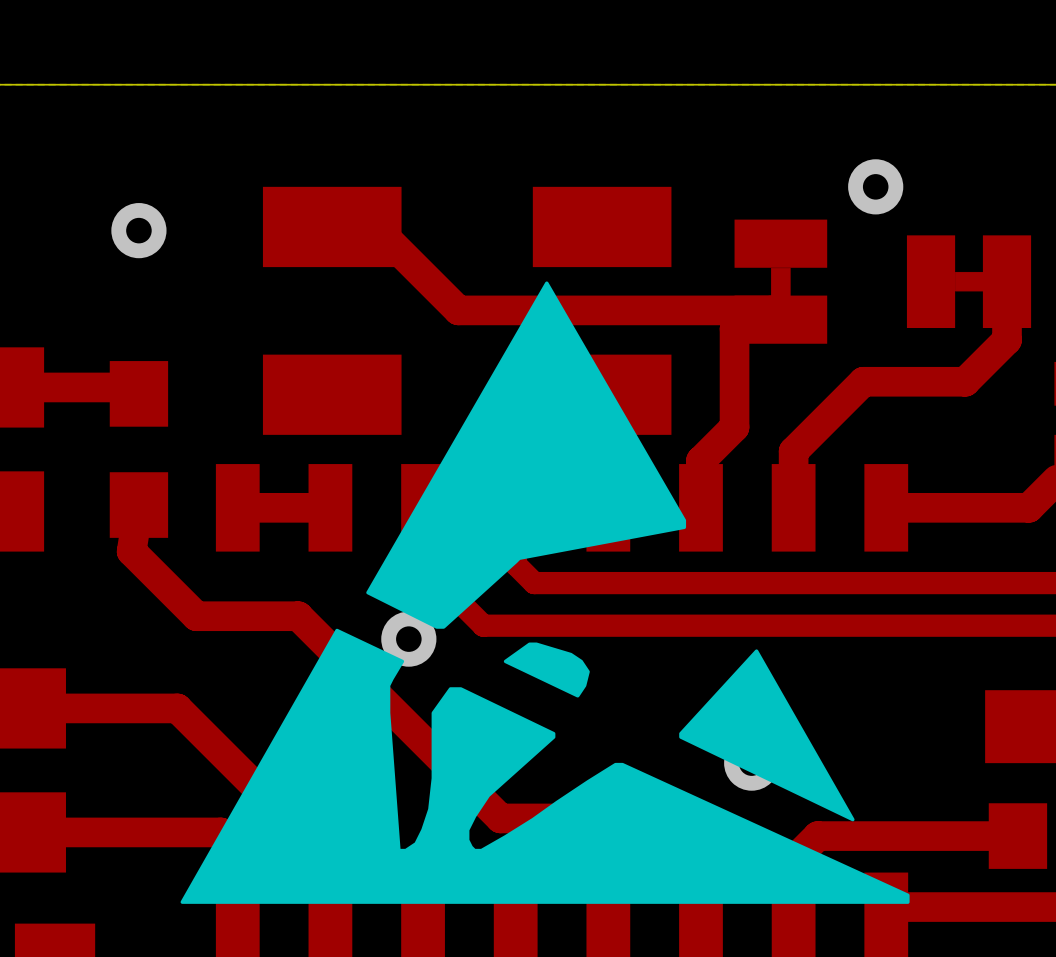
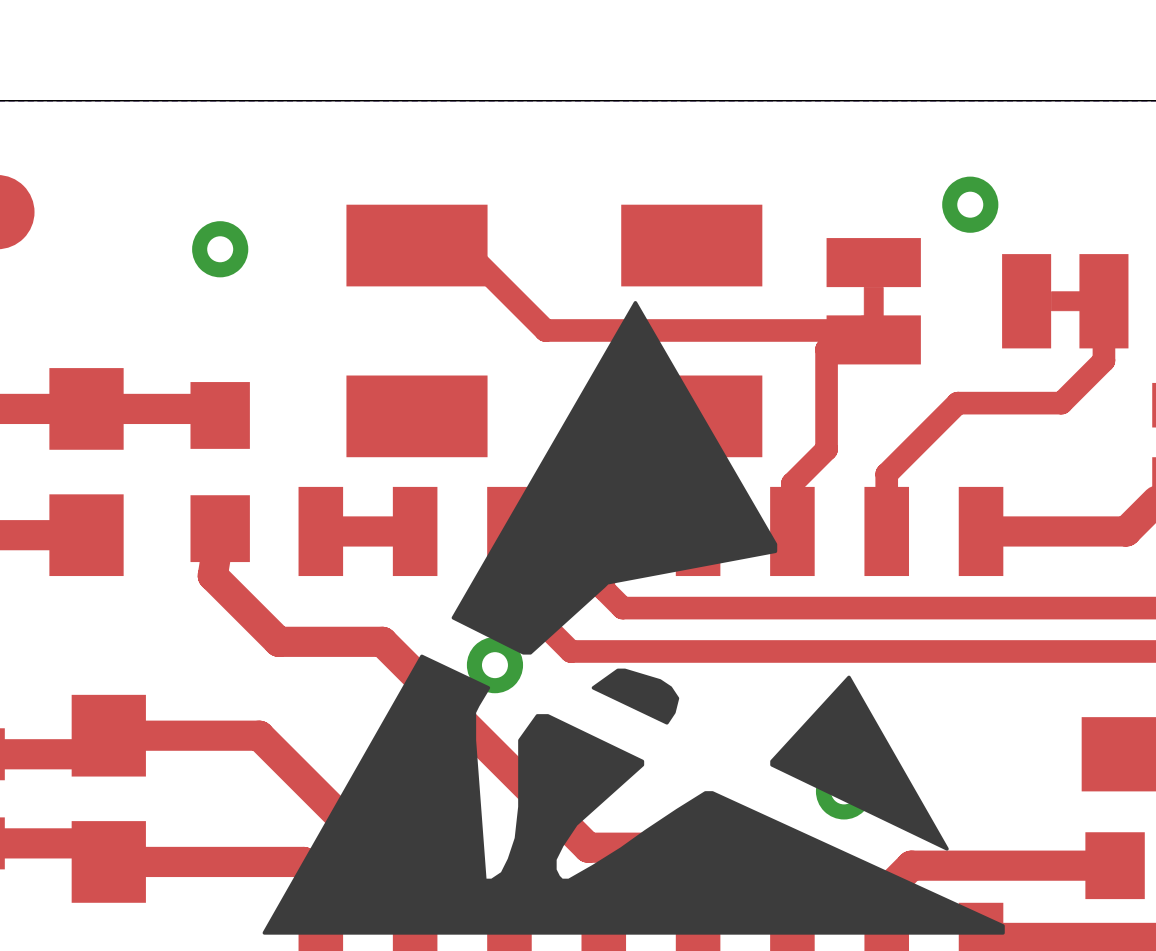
top track width: thick (375, 226) (458, 310) (771, 310) -> thin (460, 245) (545, 330) (864, 330)
top track width: thick (1007, 281) (1007, 340) (965, 381) (863, 381) (793, 451) (793, 507) -> thin (1103, 301) (1103, 360) (1061, 403) (957, 403) (886, 474) (886, 531)
top track width: thick (780, 319) (743, 319) (734, 328) (734, 427) (700, 460) (700, 507) -> thin (873, 339) (836, 339) (826, 349) (826, 449) (792, 483) (792, 531)

